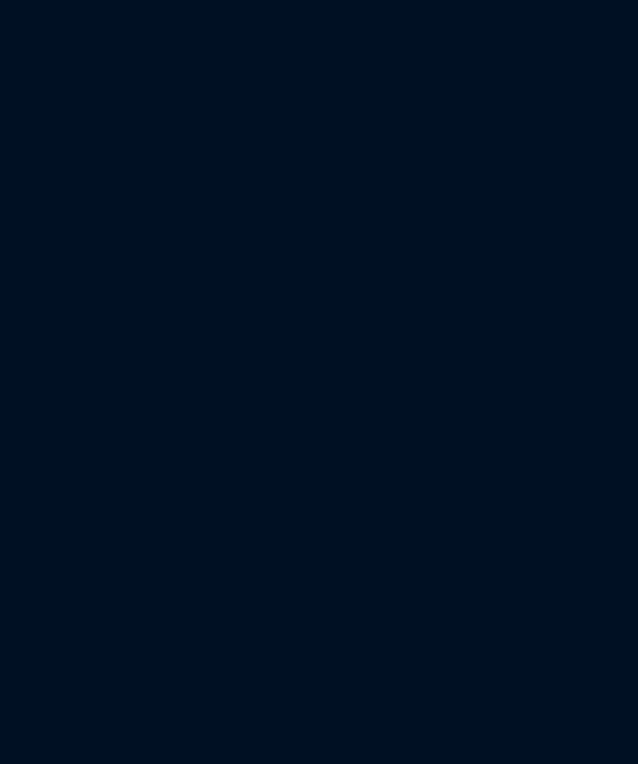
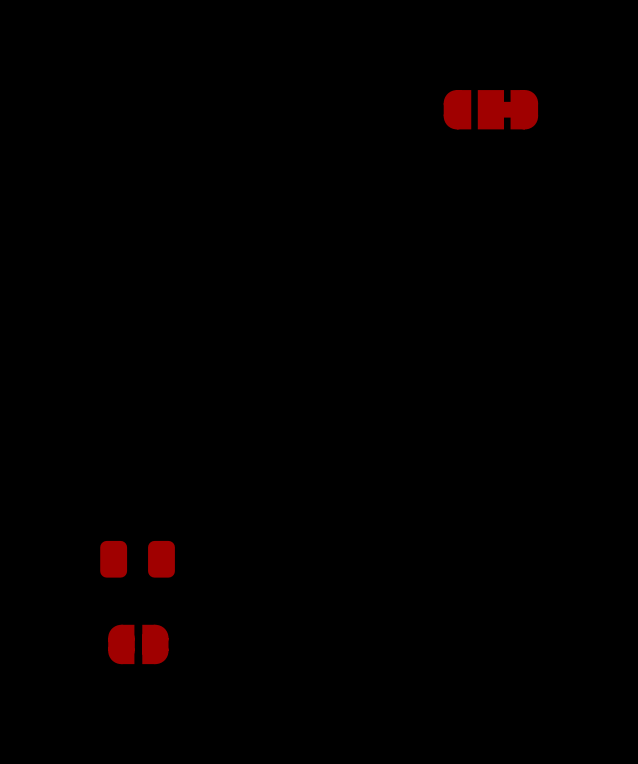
part: none -> (490, 109)
part: none -> (137, 559)
part: none -> (138, 644)

